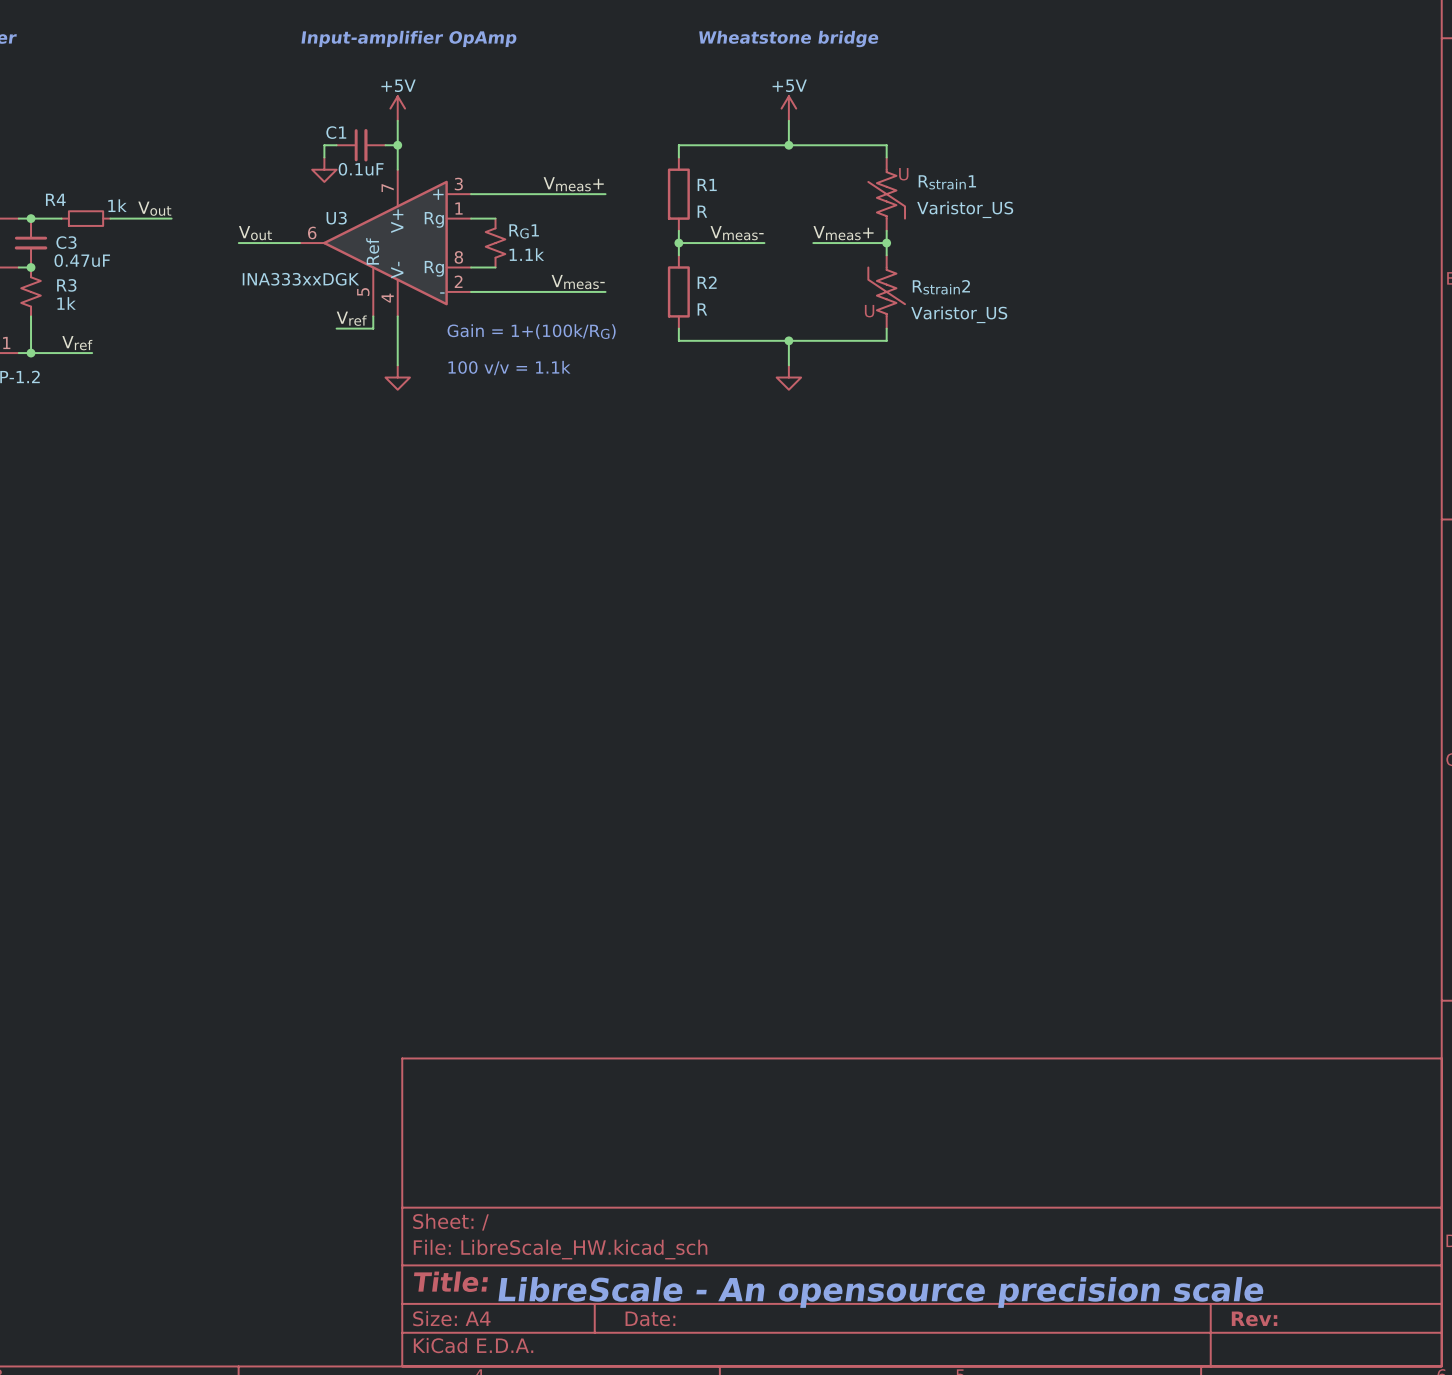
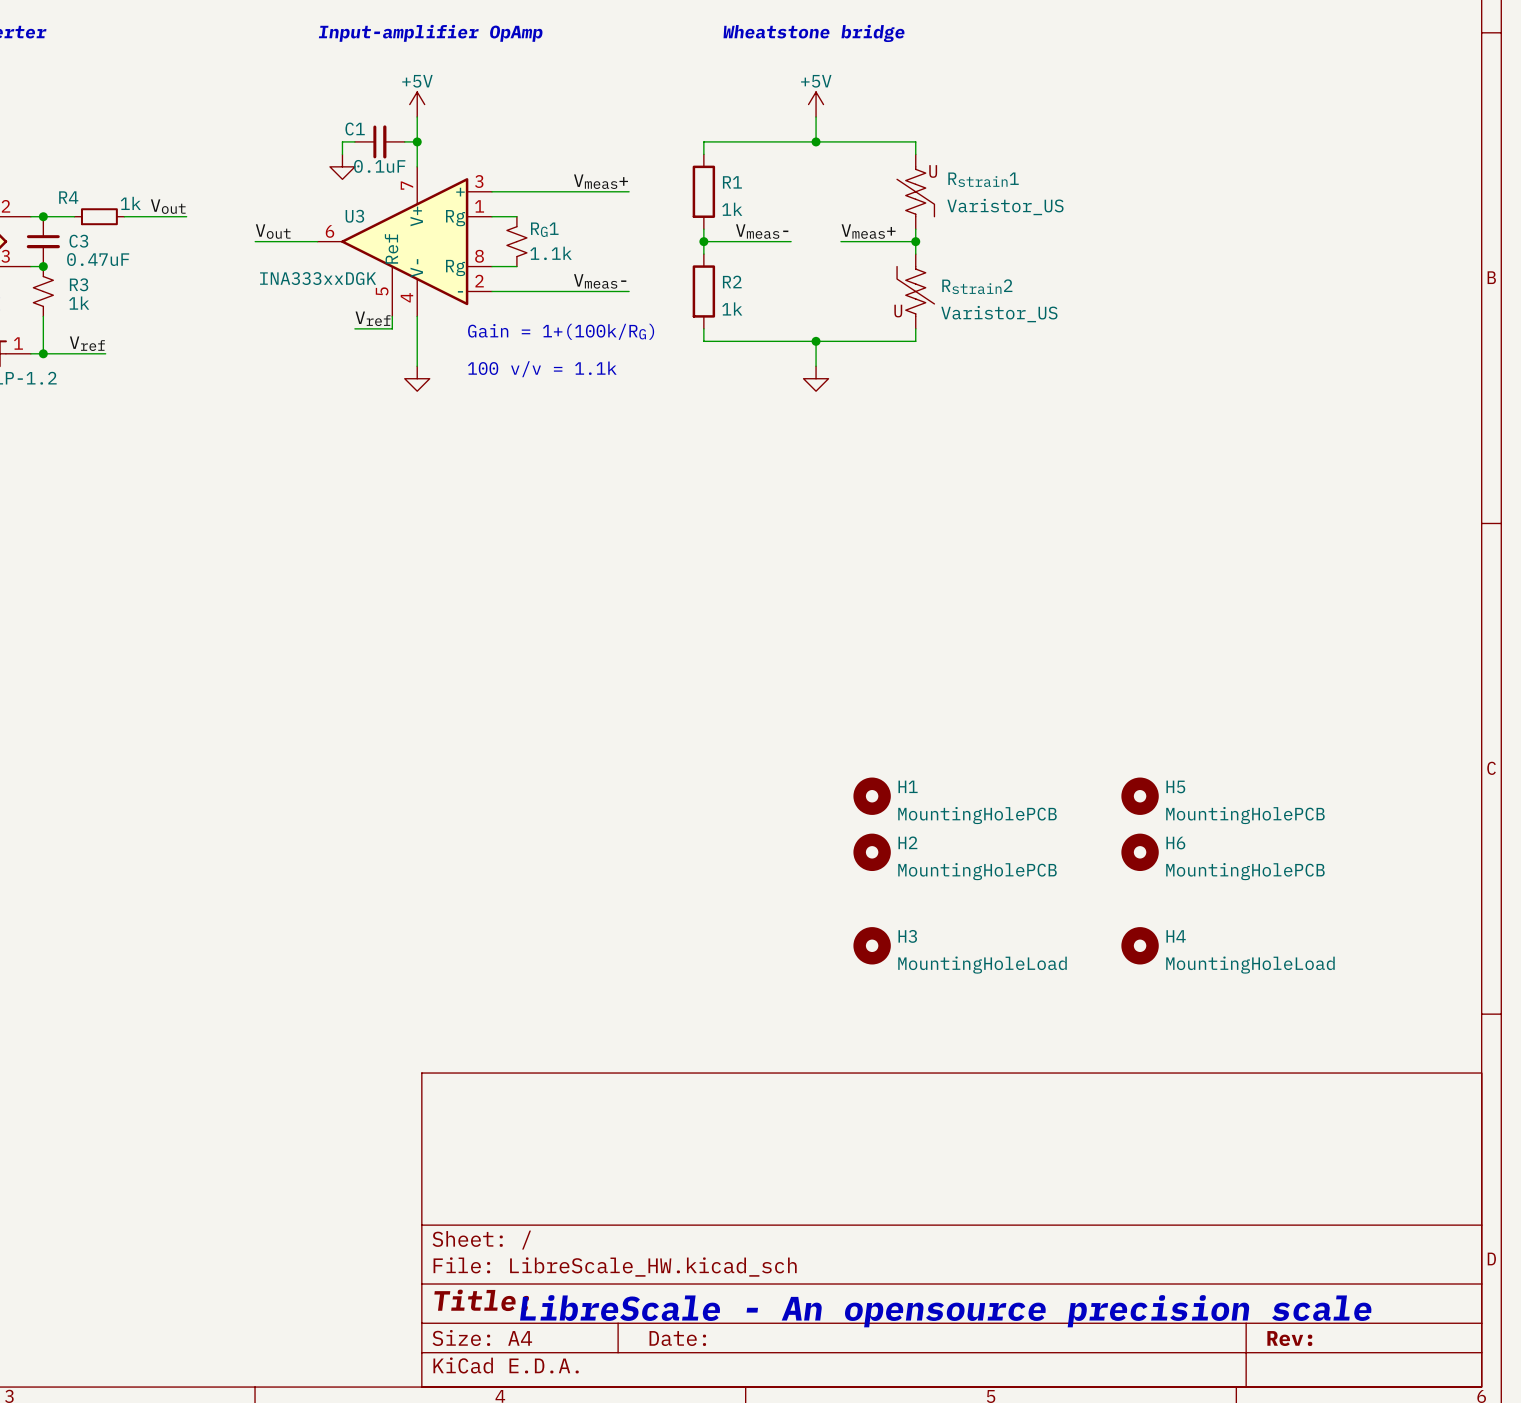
R1 value: R (702, 211) -> 1k (732, 209)
R2 value: R (702, 309) -> 1k (732, 308)
H1: none -> MountingHolePCB (872, 796)
H5: none -> MountingHolePCB (1140, 796)
H2: none -> MountingHolePCB (872, 852)
H6: none -> MountingHolePCB (1140, 852)
H3: none -> MountingHoleLoad (872, 945)
H4: none -> MountingHoleLoad (1140, 945)

